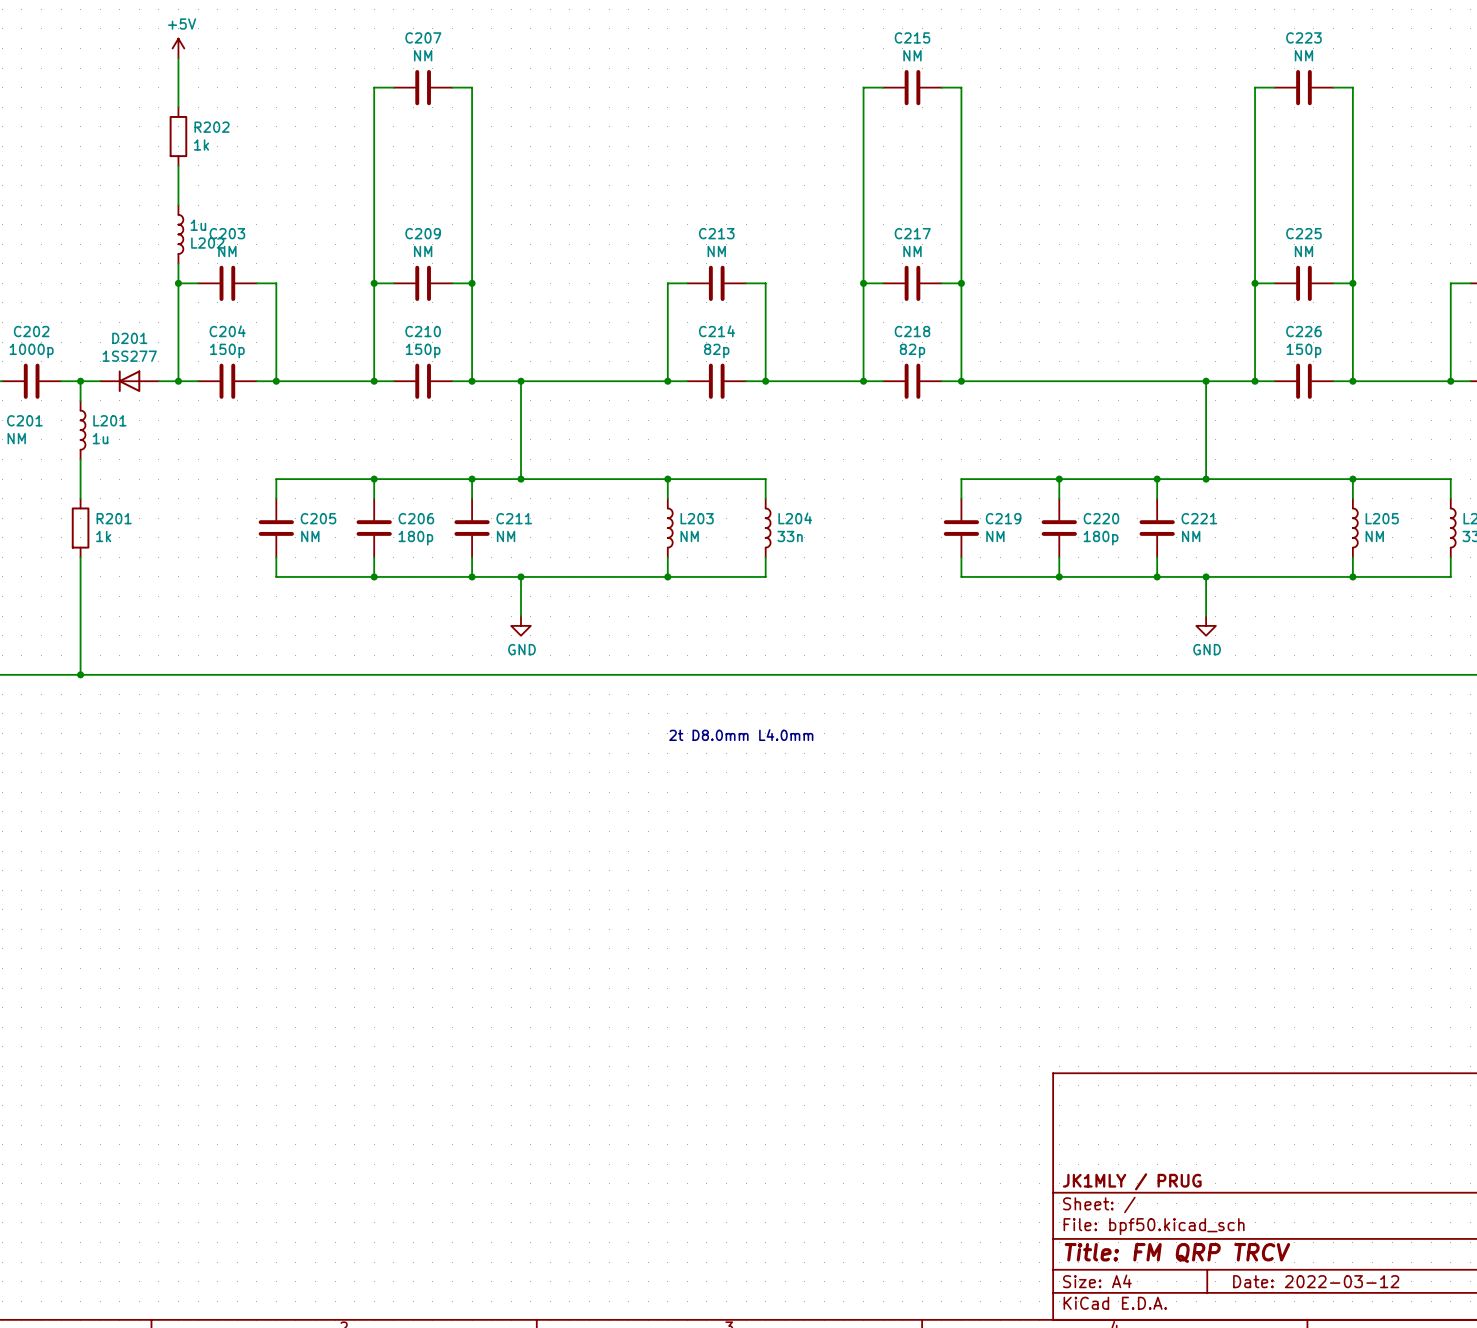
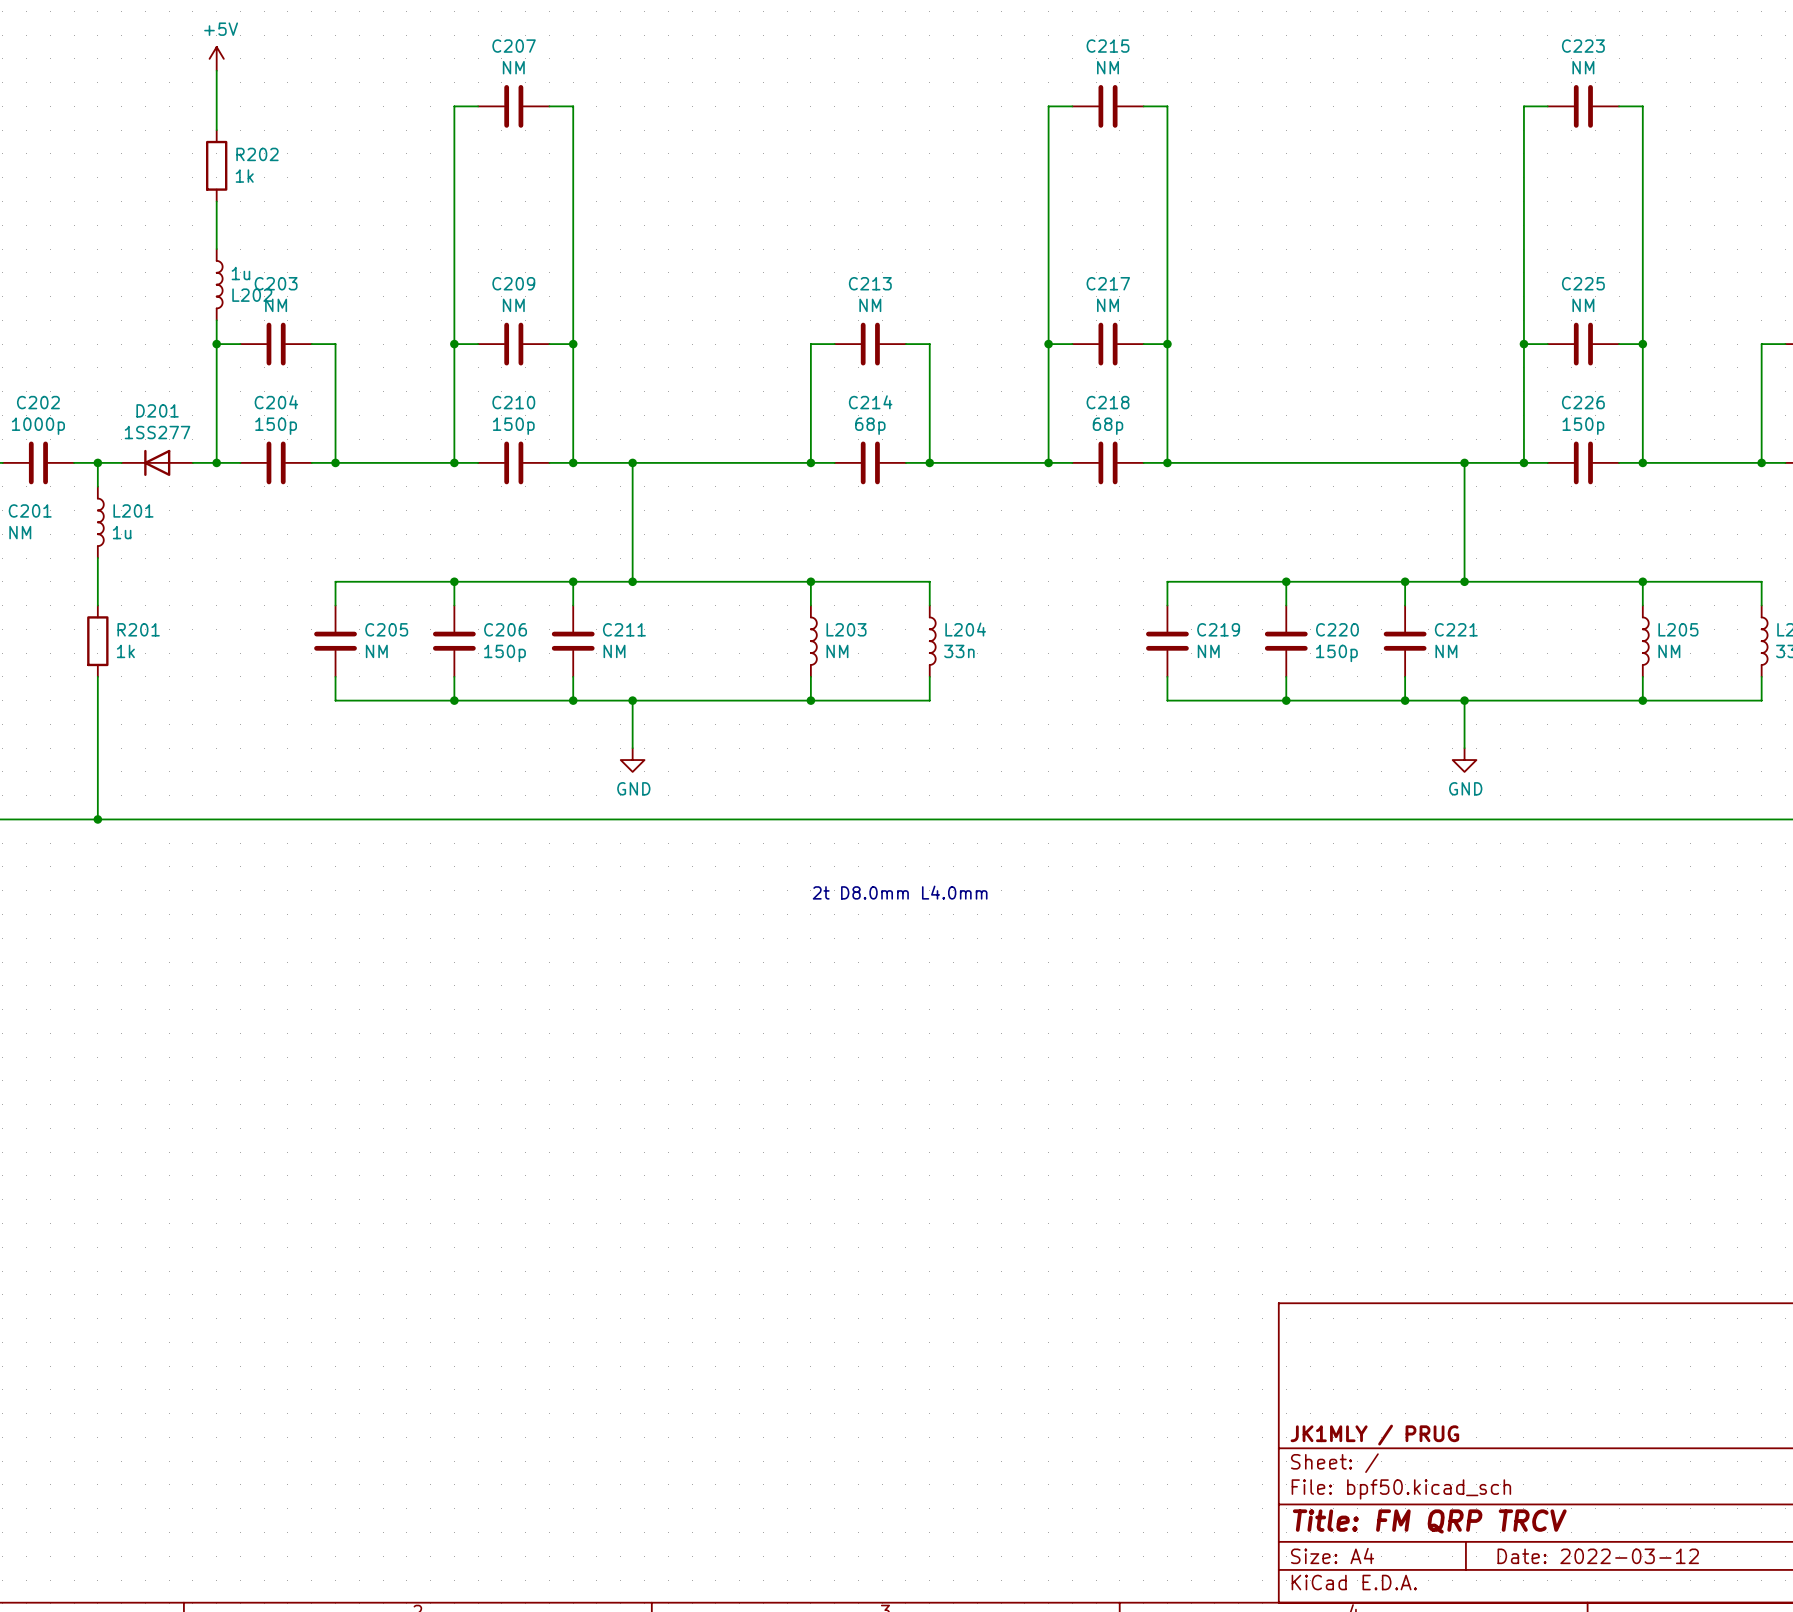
C214 value: 82p (716, 350) -> 68p (870, 426)
C218 value: 82p (912, 350) -> 68p (1108, 426)
C206 value: 180p (415, 538) -> 150p (505, 653)
C220 value: 180p (1100, 538) -> 150p (1336, 653)

